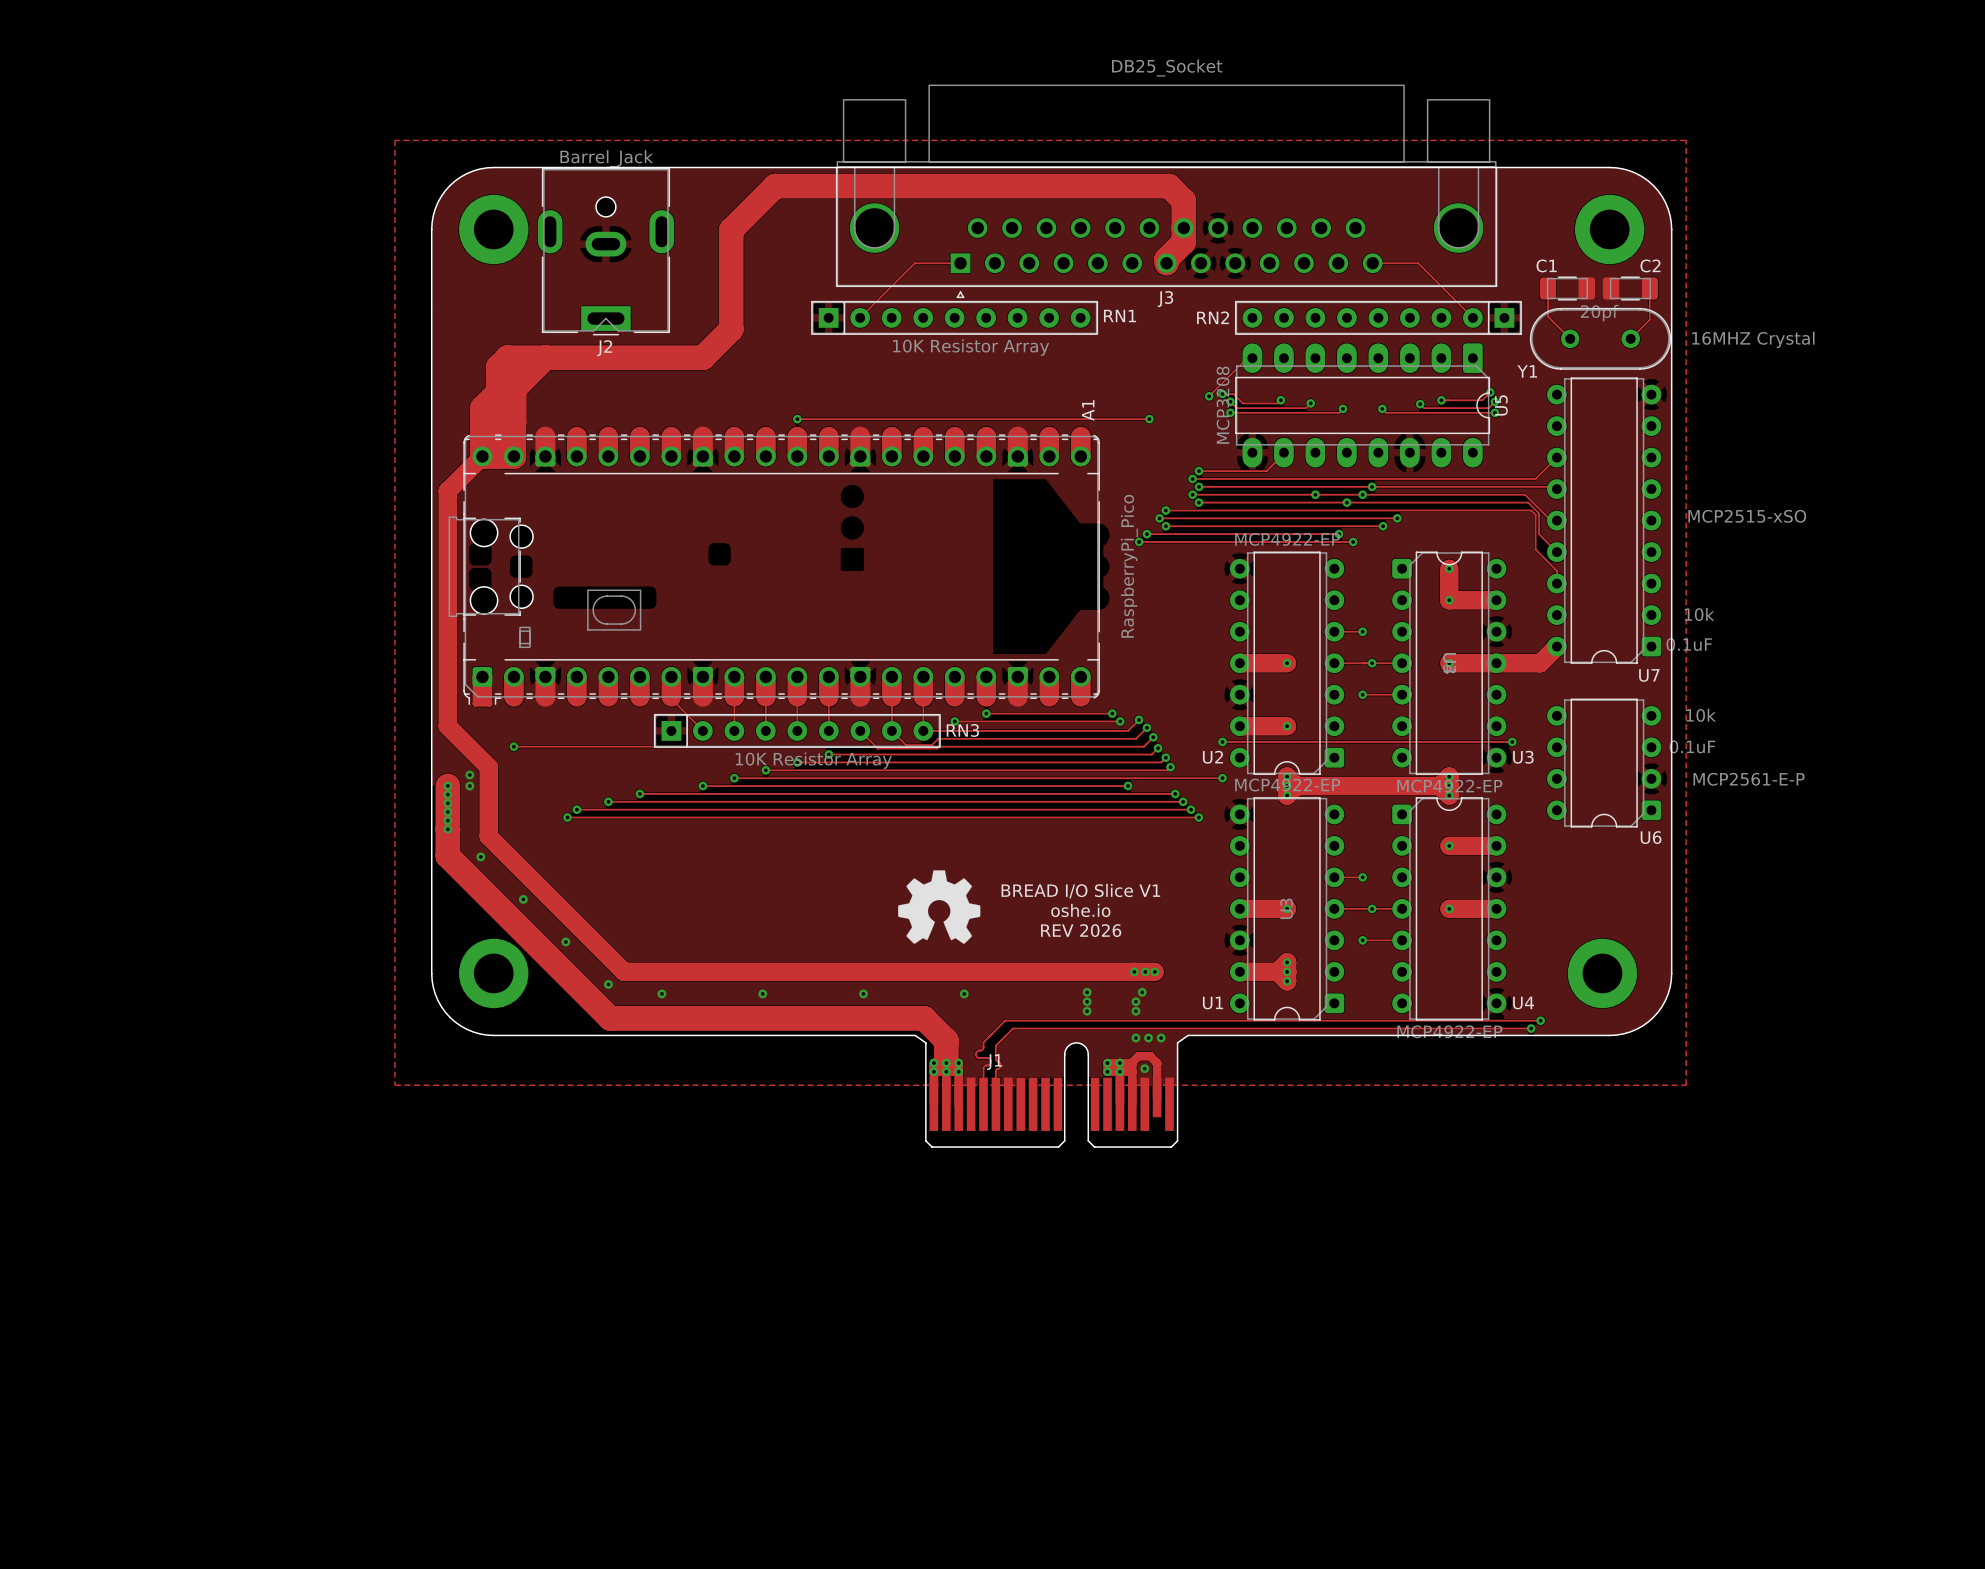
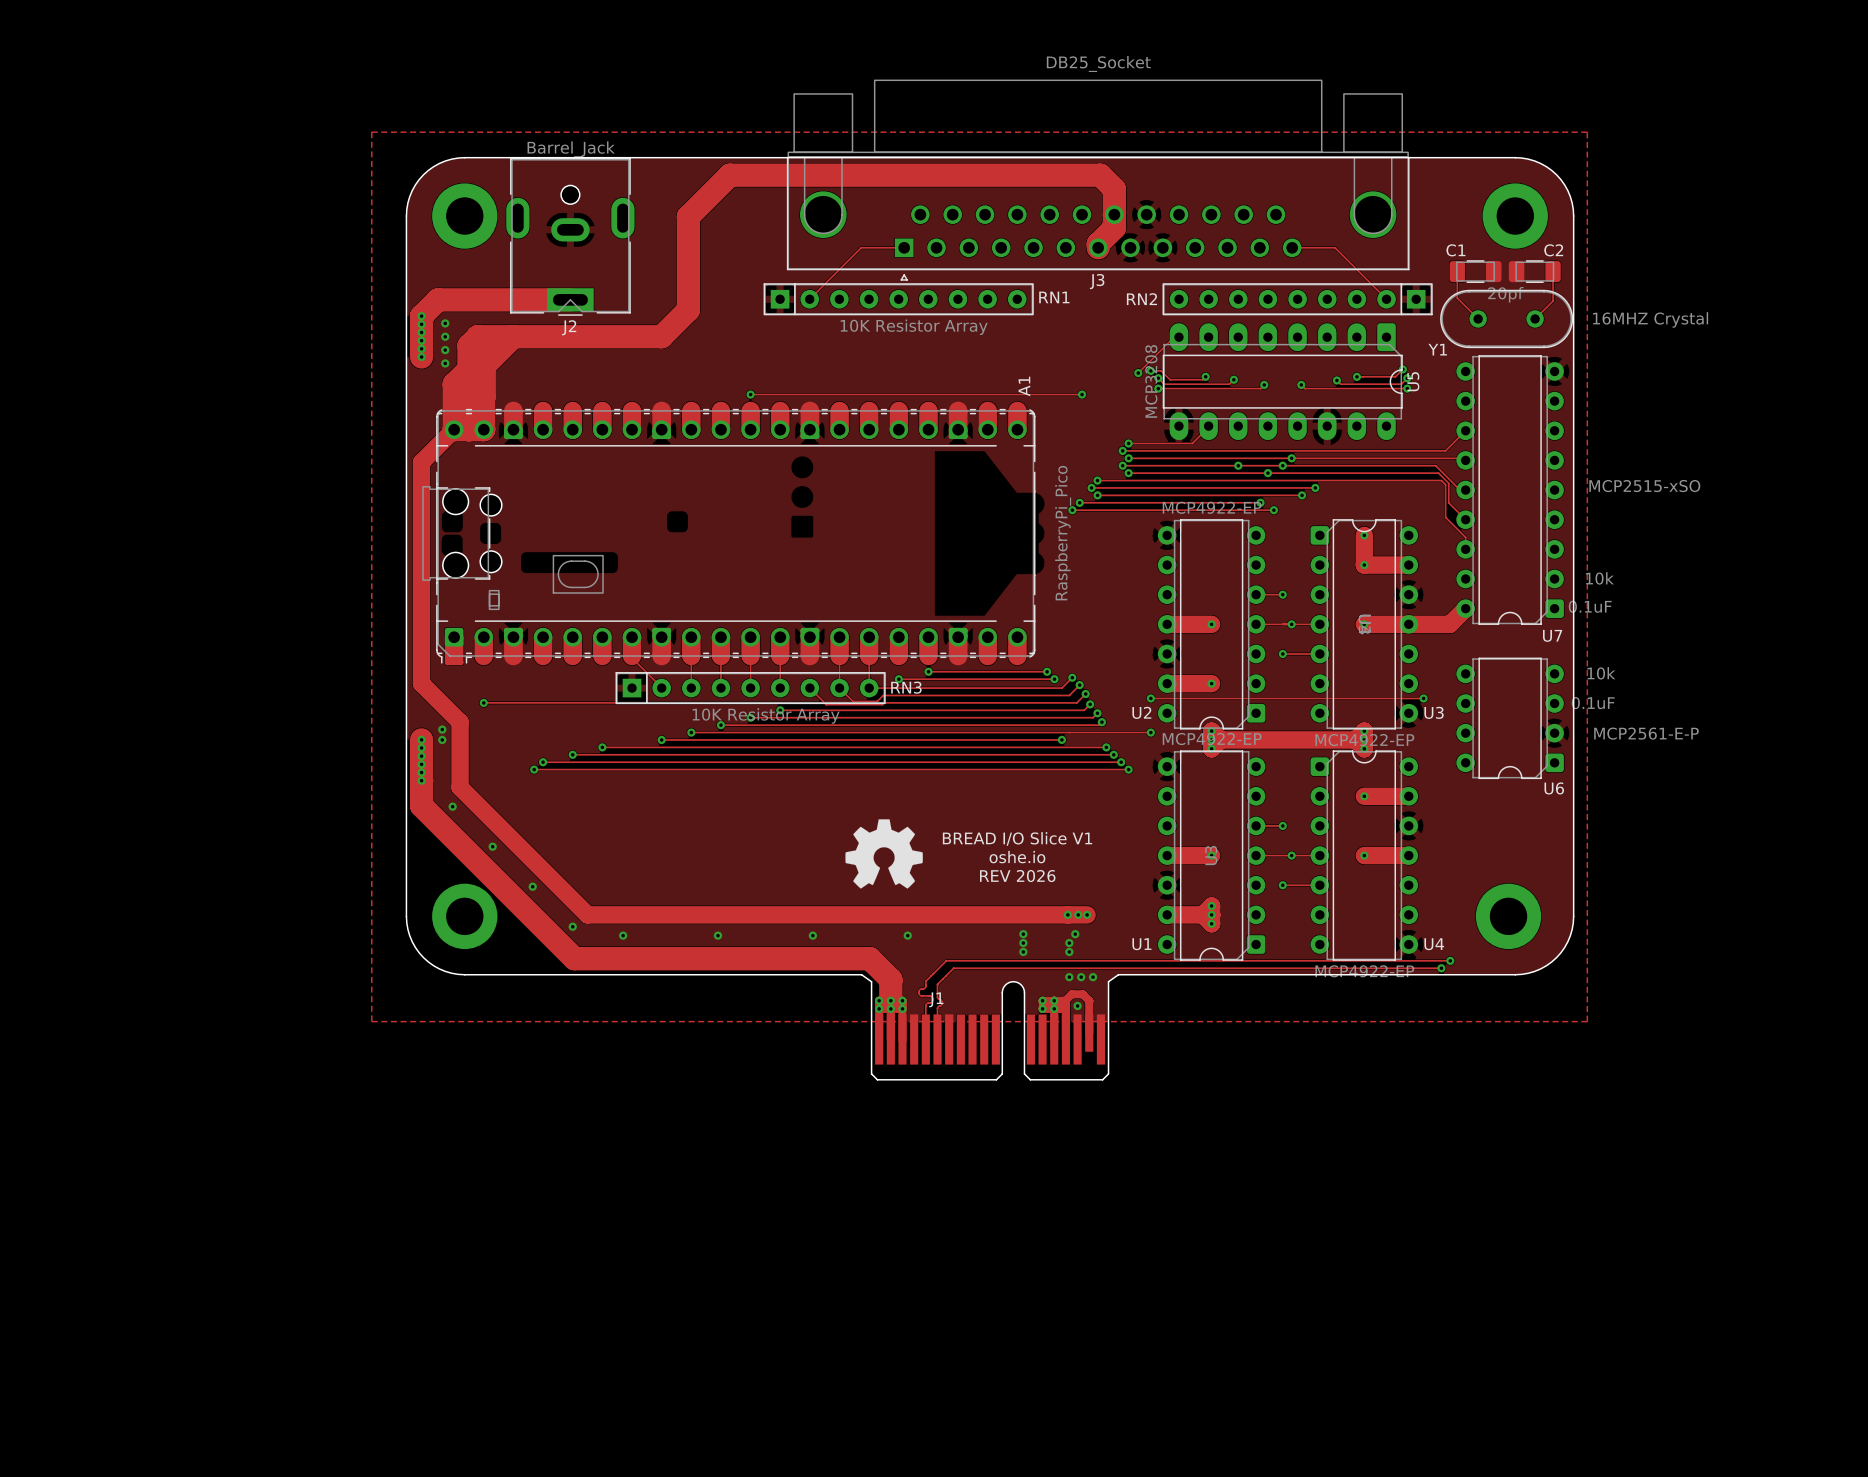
track: none -> (570, 299) (437, 299) (421, 316) (421, 356)
via: none -> (421, 316)
via: none -> (445, 323)
via: none -> (421, 324)
via: none -> (421, 332)
via: none -> (445, 336)
via: none -> (421, 340)
via: none -> (421, 348)
via: none -> (445, 350)
via: none -> (421, 356)
via: none -> (445, 363)

